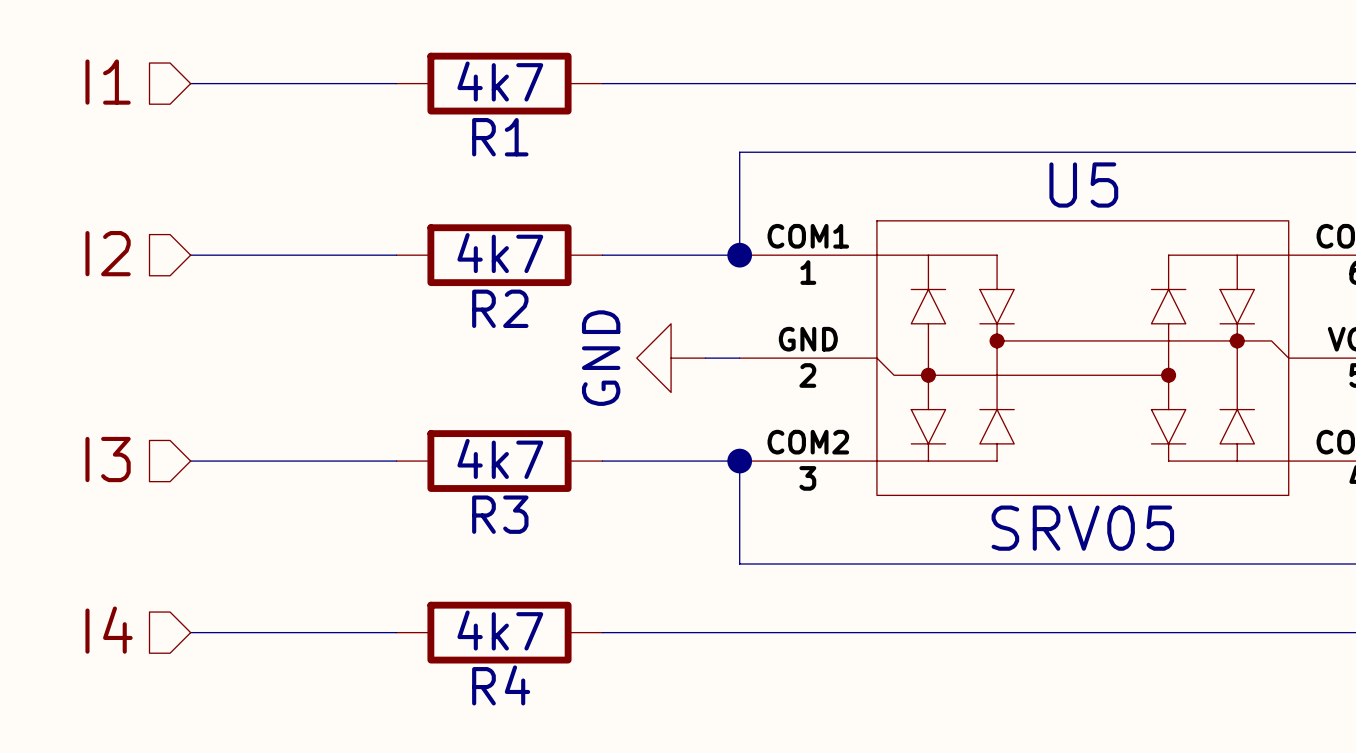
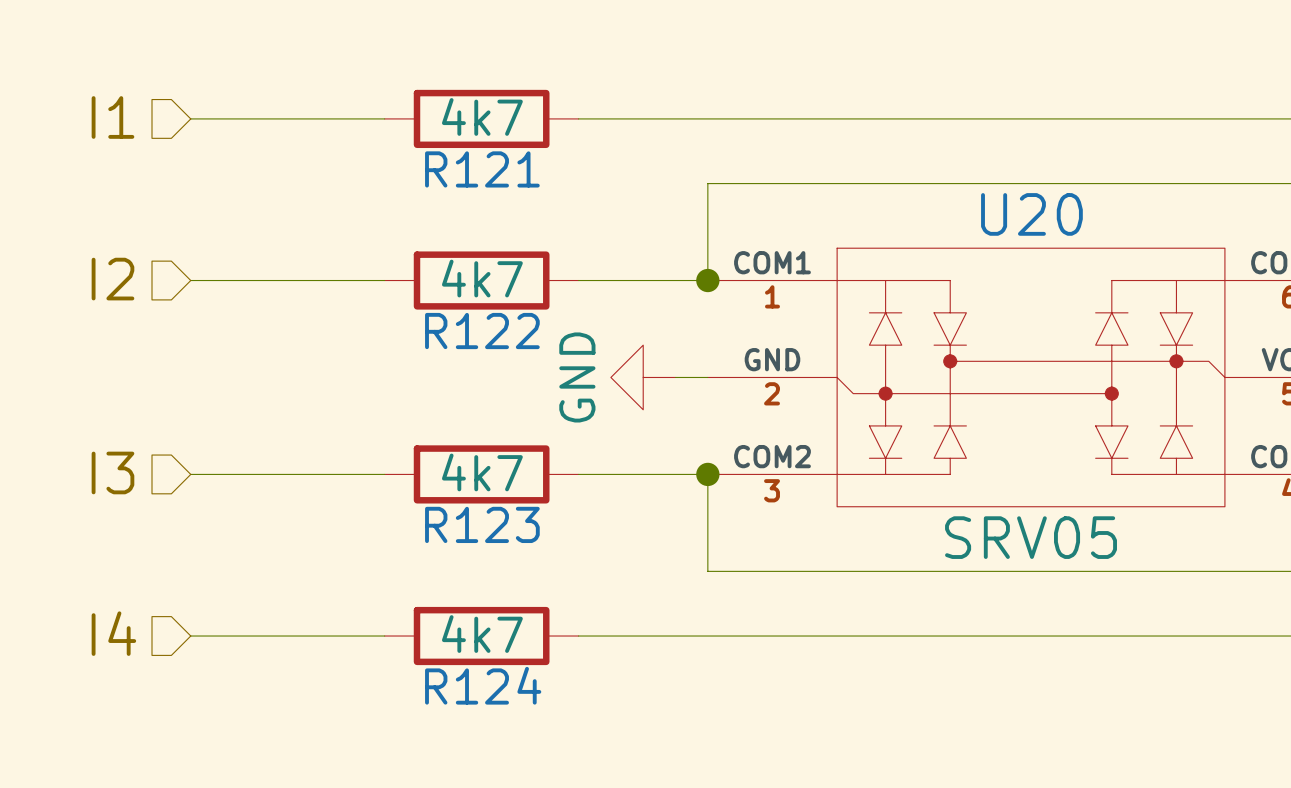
R1 name: R1 (500, 137) -> R121 (482, 169)
U5 name: U5 (1083, 185) -> U20 (1031, 214)
R2 name: R2 (500, 308) -> R122 (482, 331)
R3 name: R3 (500, 514) -> R123 (482, 524)
R4 name: R4 (501, 685) -> R124 (483, 685)

